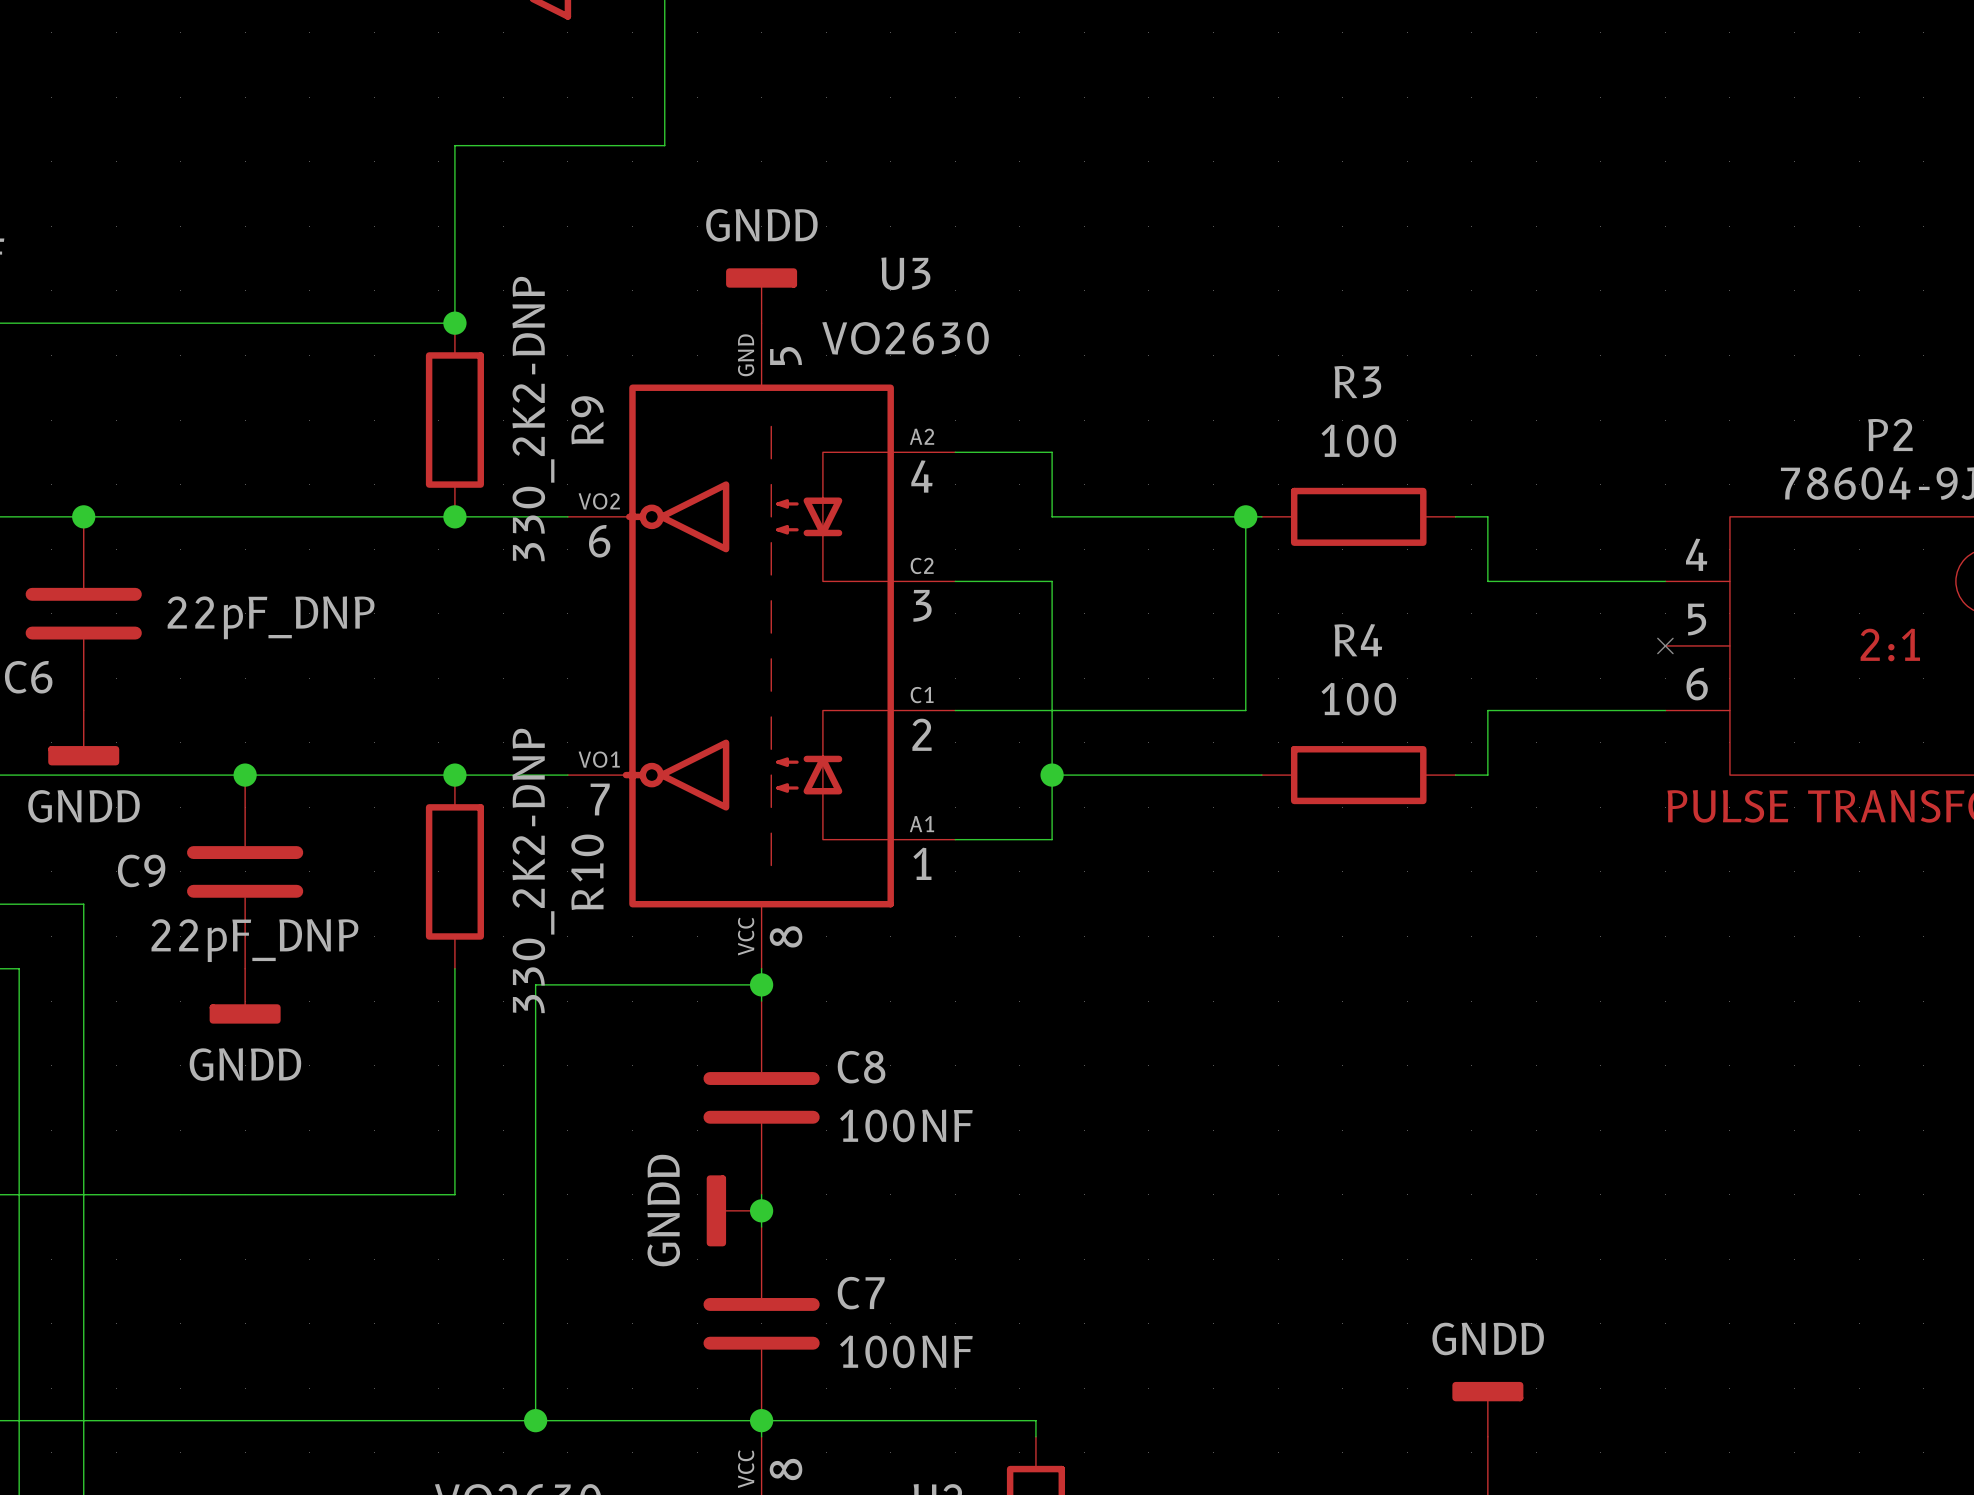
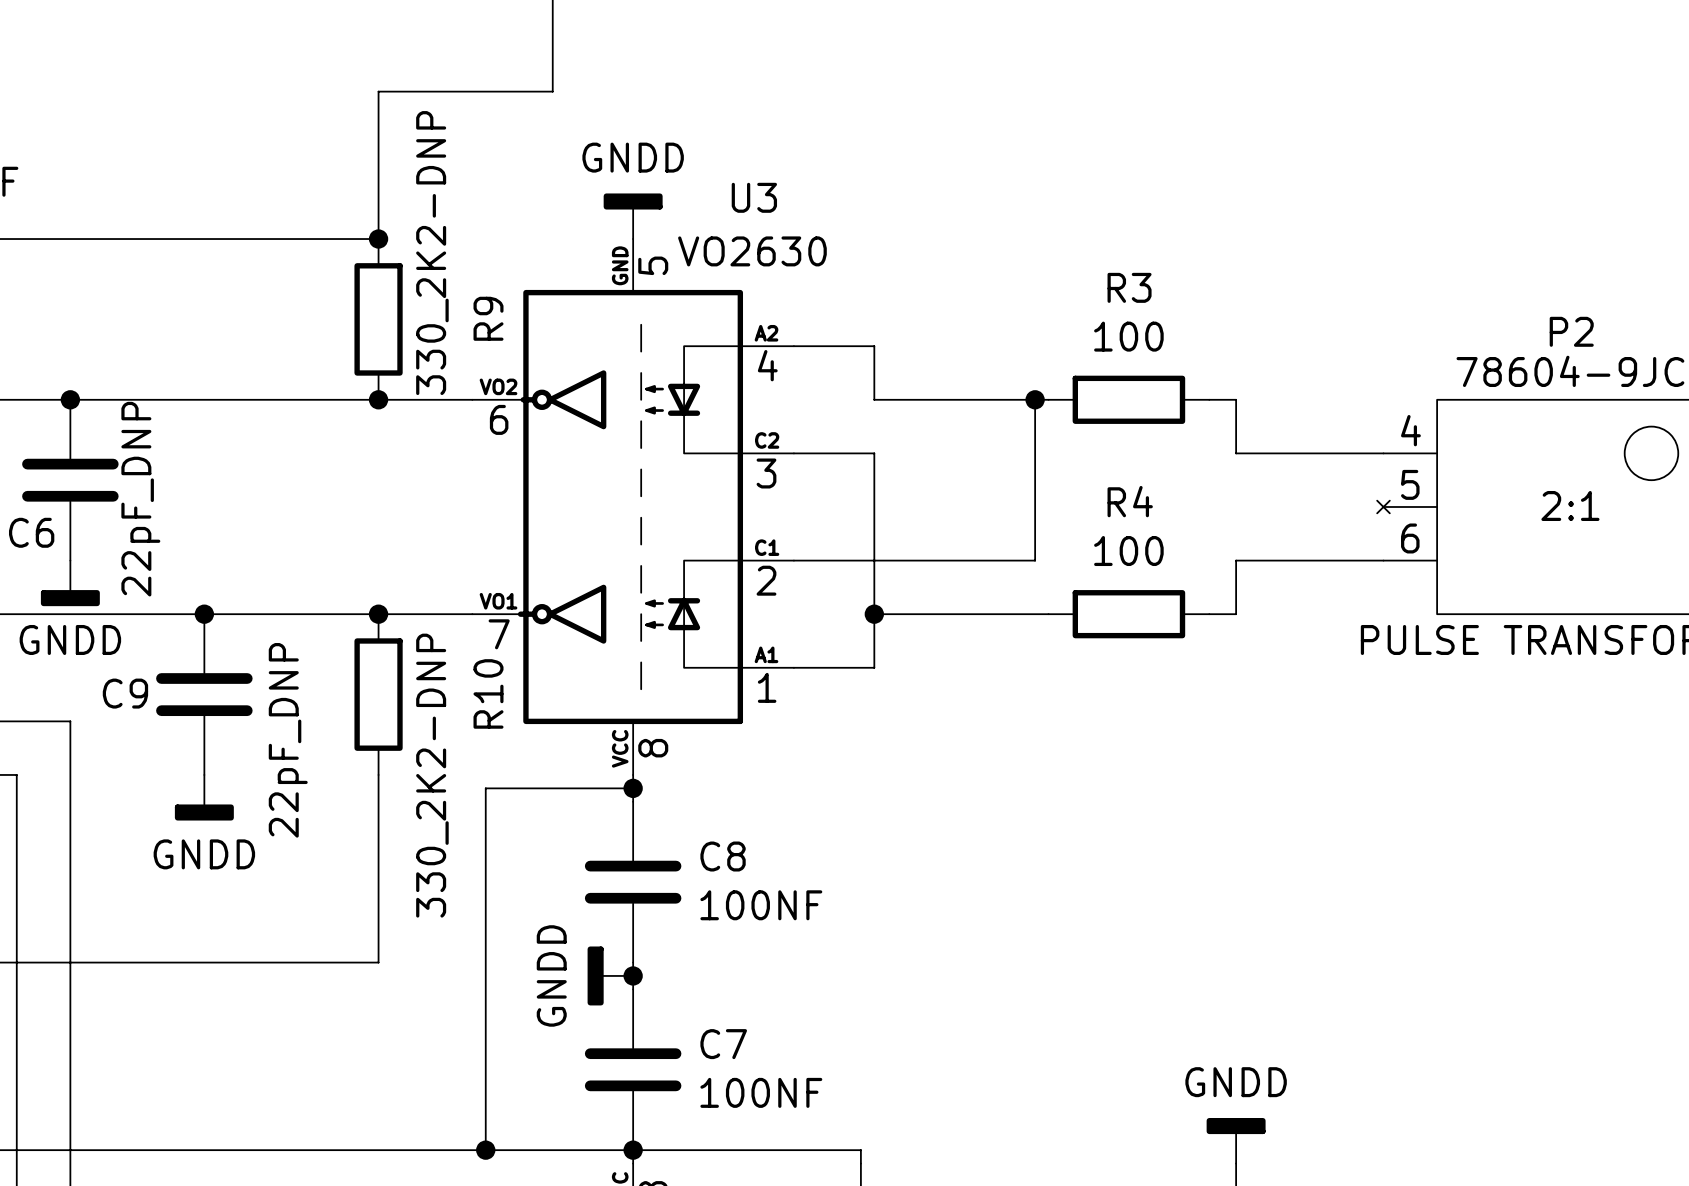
R9 value position: 330_2K2-DNP (533, 419) -> 330_2K2-DNP (432, 253)
C6 value rotation: 0° (271, 617) -> 90° counterclockwise (140, 499)
R10 value position: 330_2K2-DNP (533, 870) -> 330_2K2-DNP (432, 775)
C9 value rotation: 0° (254, 940) -> 90° counterclockwise (288, 740)
wire: (584, 984) (535, 984) (535, 1420) -> (485, 788) (485, 1150)
junction position: (535, 1420) -> (485, 1150)

